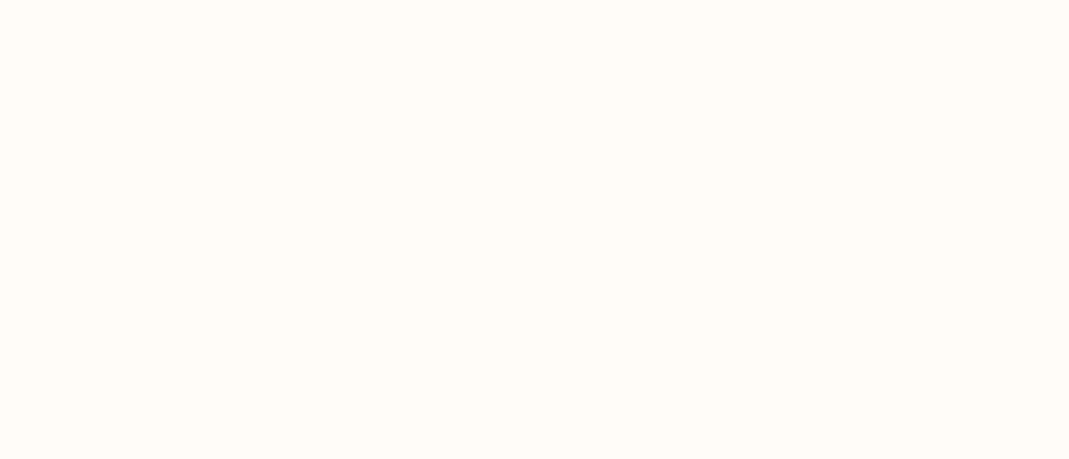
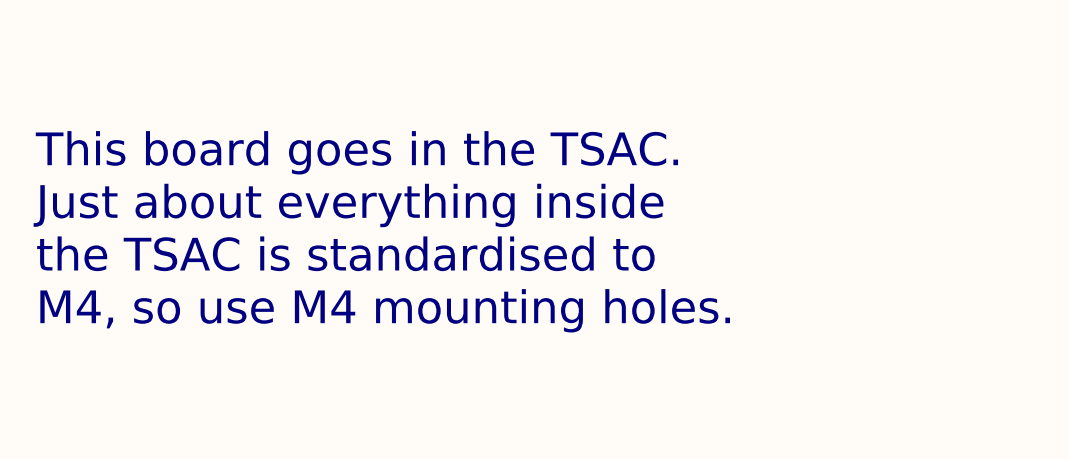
text: none -> This board goes in the TSAC. (356, 152)
text: none -> Just about everything inside (348, 205)
text: none -> the TSAC is standardised to (345, 253)
text: none -> M4, so use M4 mounting holes. (385, 310)

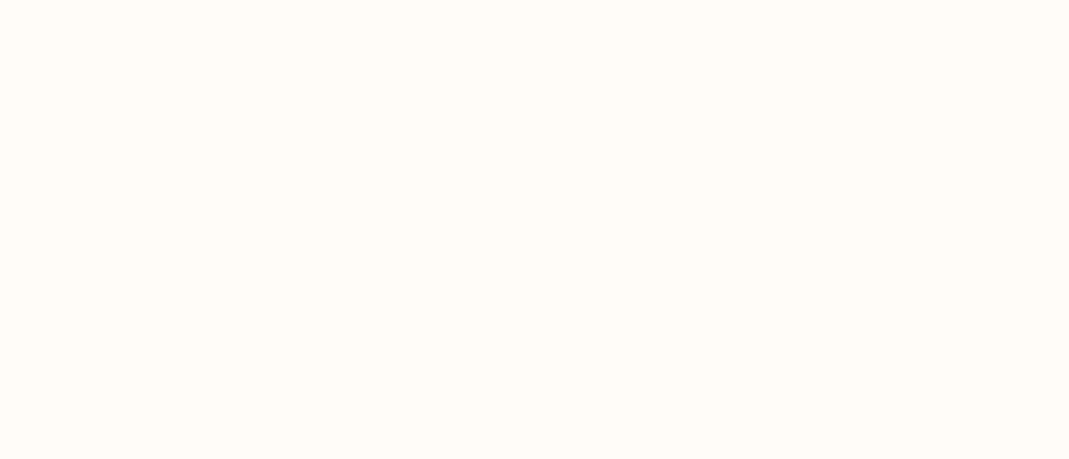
text: This board goes in the TSAC. (356, 152) -> none
text: Just about everything inside (348, 205) -> none
text: the TSAC is standardised to (345, 253) -> none
text: M4, so use M4 mounting holes. (385, 310) -> none

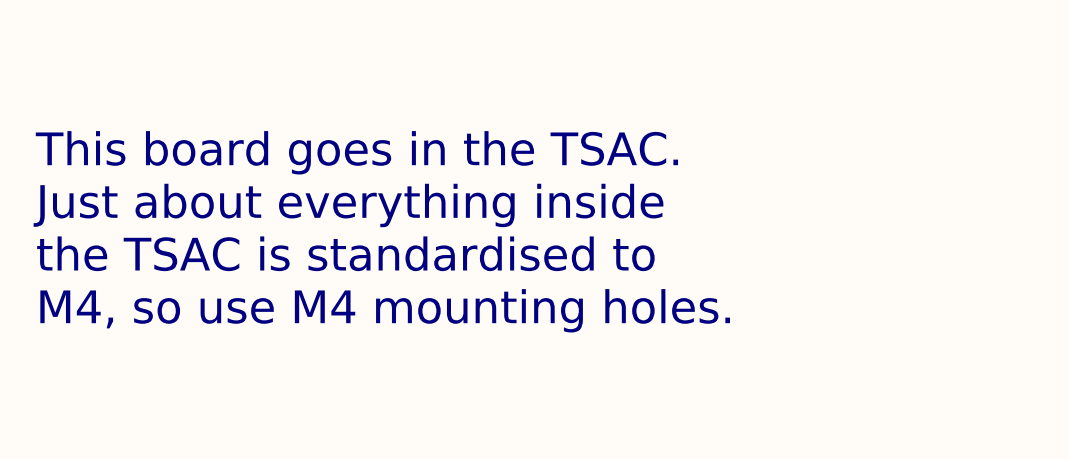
text: none -> This board goes in the TSAC. (356, 152)
text: none -> Just about everything inside (348, 205)
text: none -> the TSAC is standardised to (345, 253)
text: none -> M4, so use M4 mounting holes. (385, 310)

